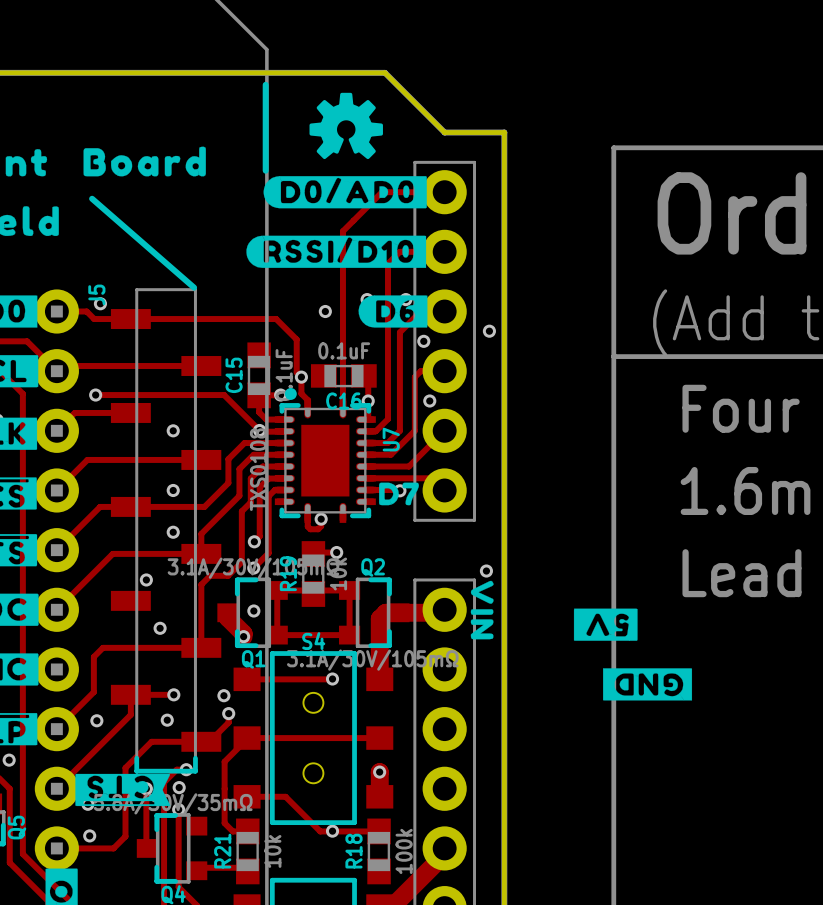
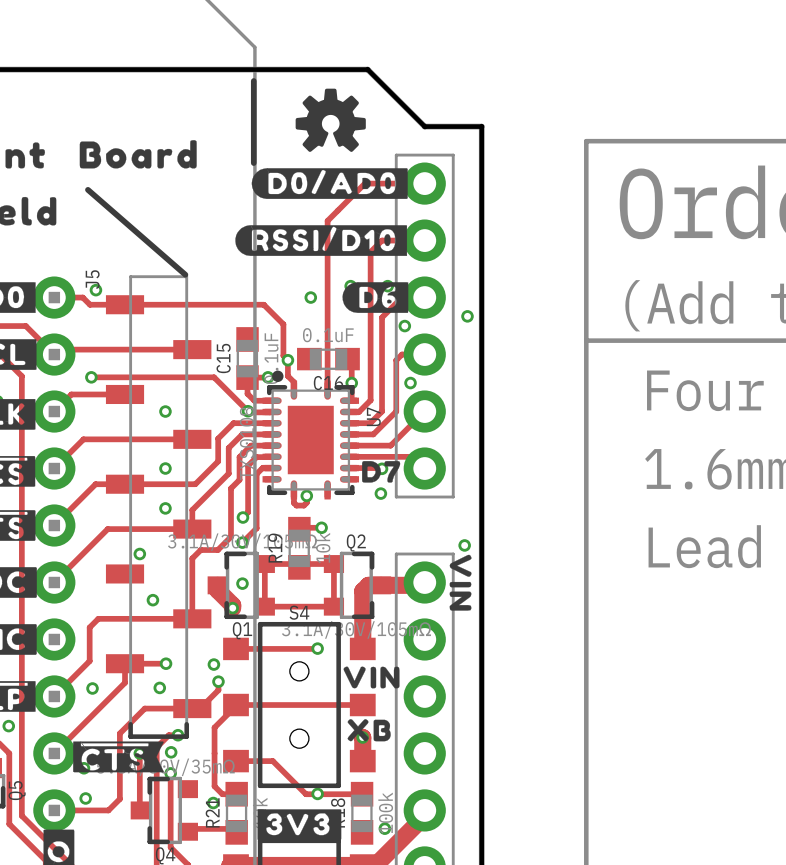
via: none -> (380, 493)
drawing: [573, 608, 693, 701] -> none
drawing: none -> [343, 666, 400, 689]
drawing: none -> [347, 719, 391, 742]
drawing shape: [75, 773, 171, 807] -> [73, 741, 164, 773]
via: none -> (213, 803)
drawing: none -> [257, 809, 342, 841]
via: none -> (384, 828)

